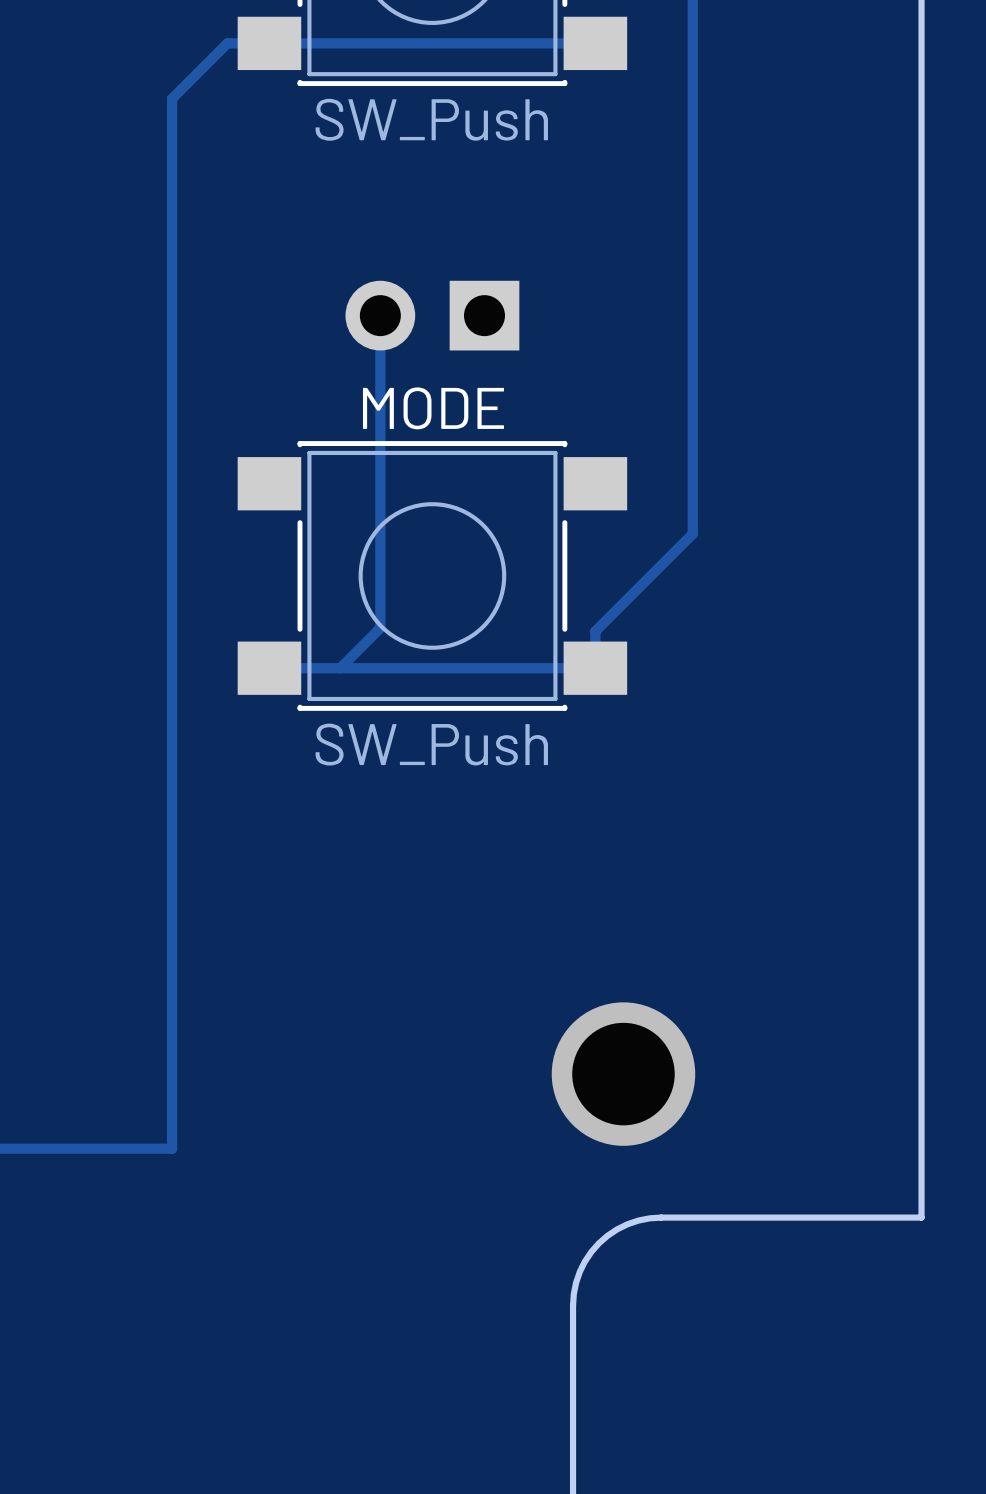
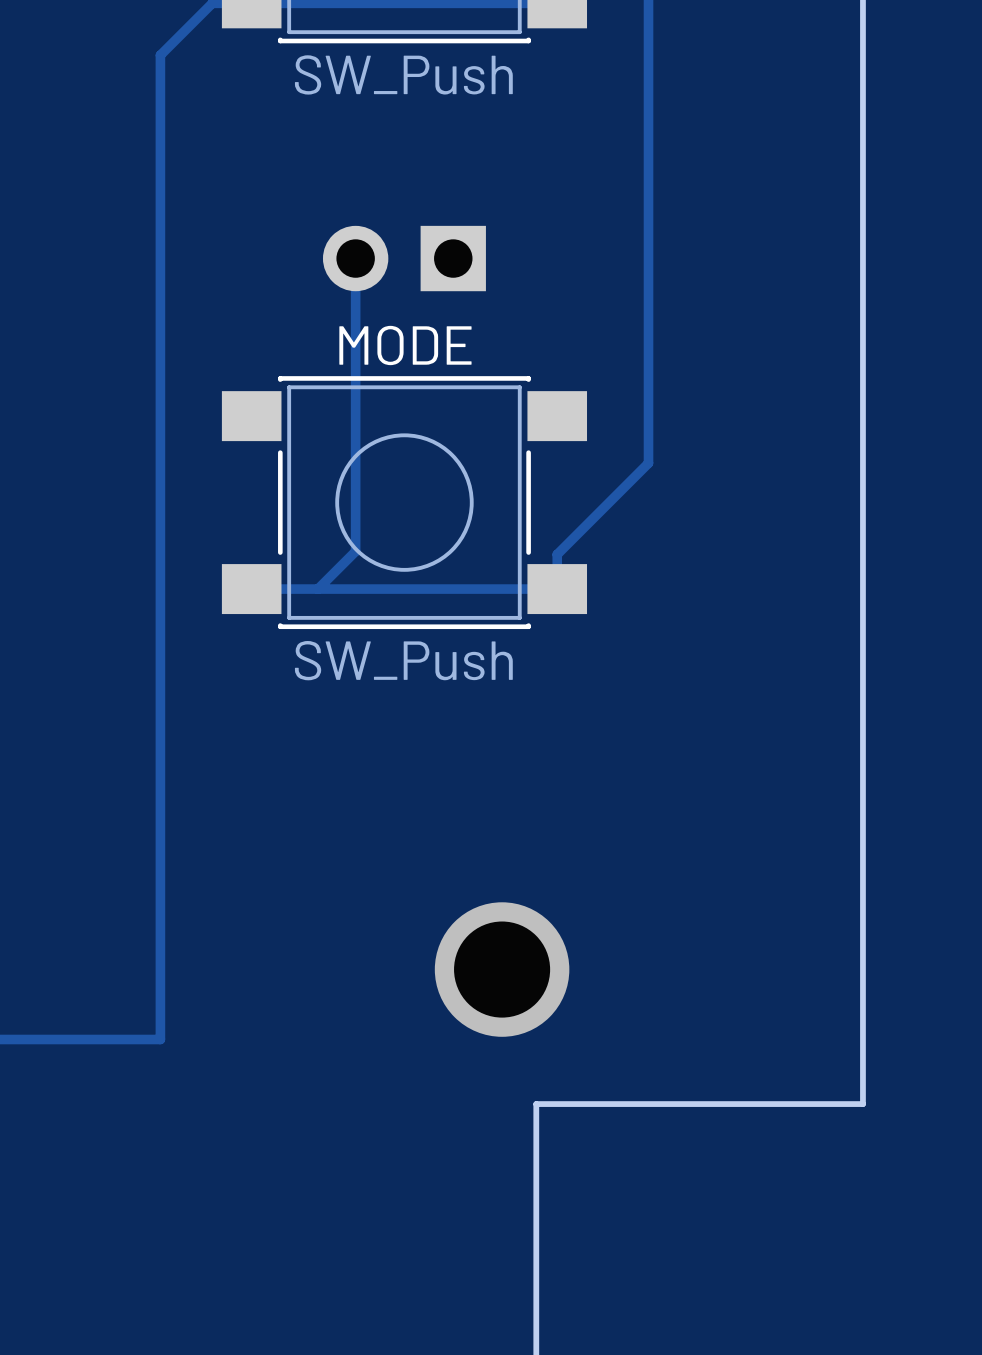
via position: (623, 1074) -> (502, 969)
board edge: (661, 1217) (649, 1218) (627, 1224) (617, 1229) (598, 1243) (584, 1261) (579, 1272) (573, 1294) (573, 1305) -> (618, 1104) (536, 1104) (536, 1186)

